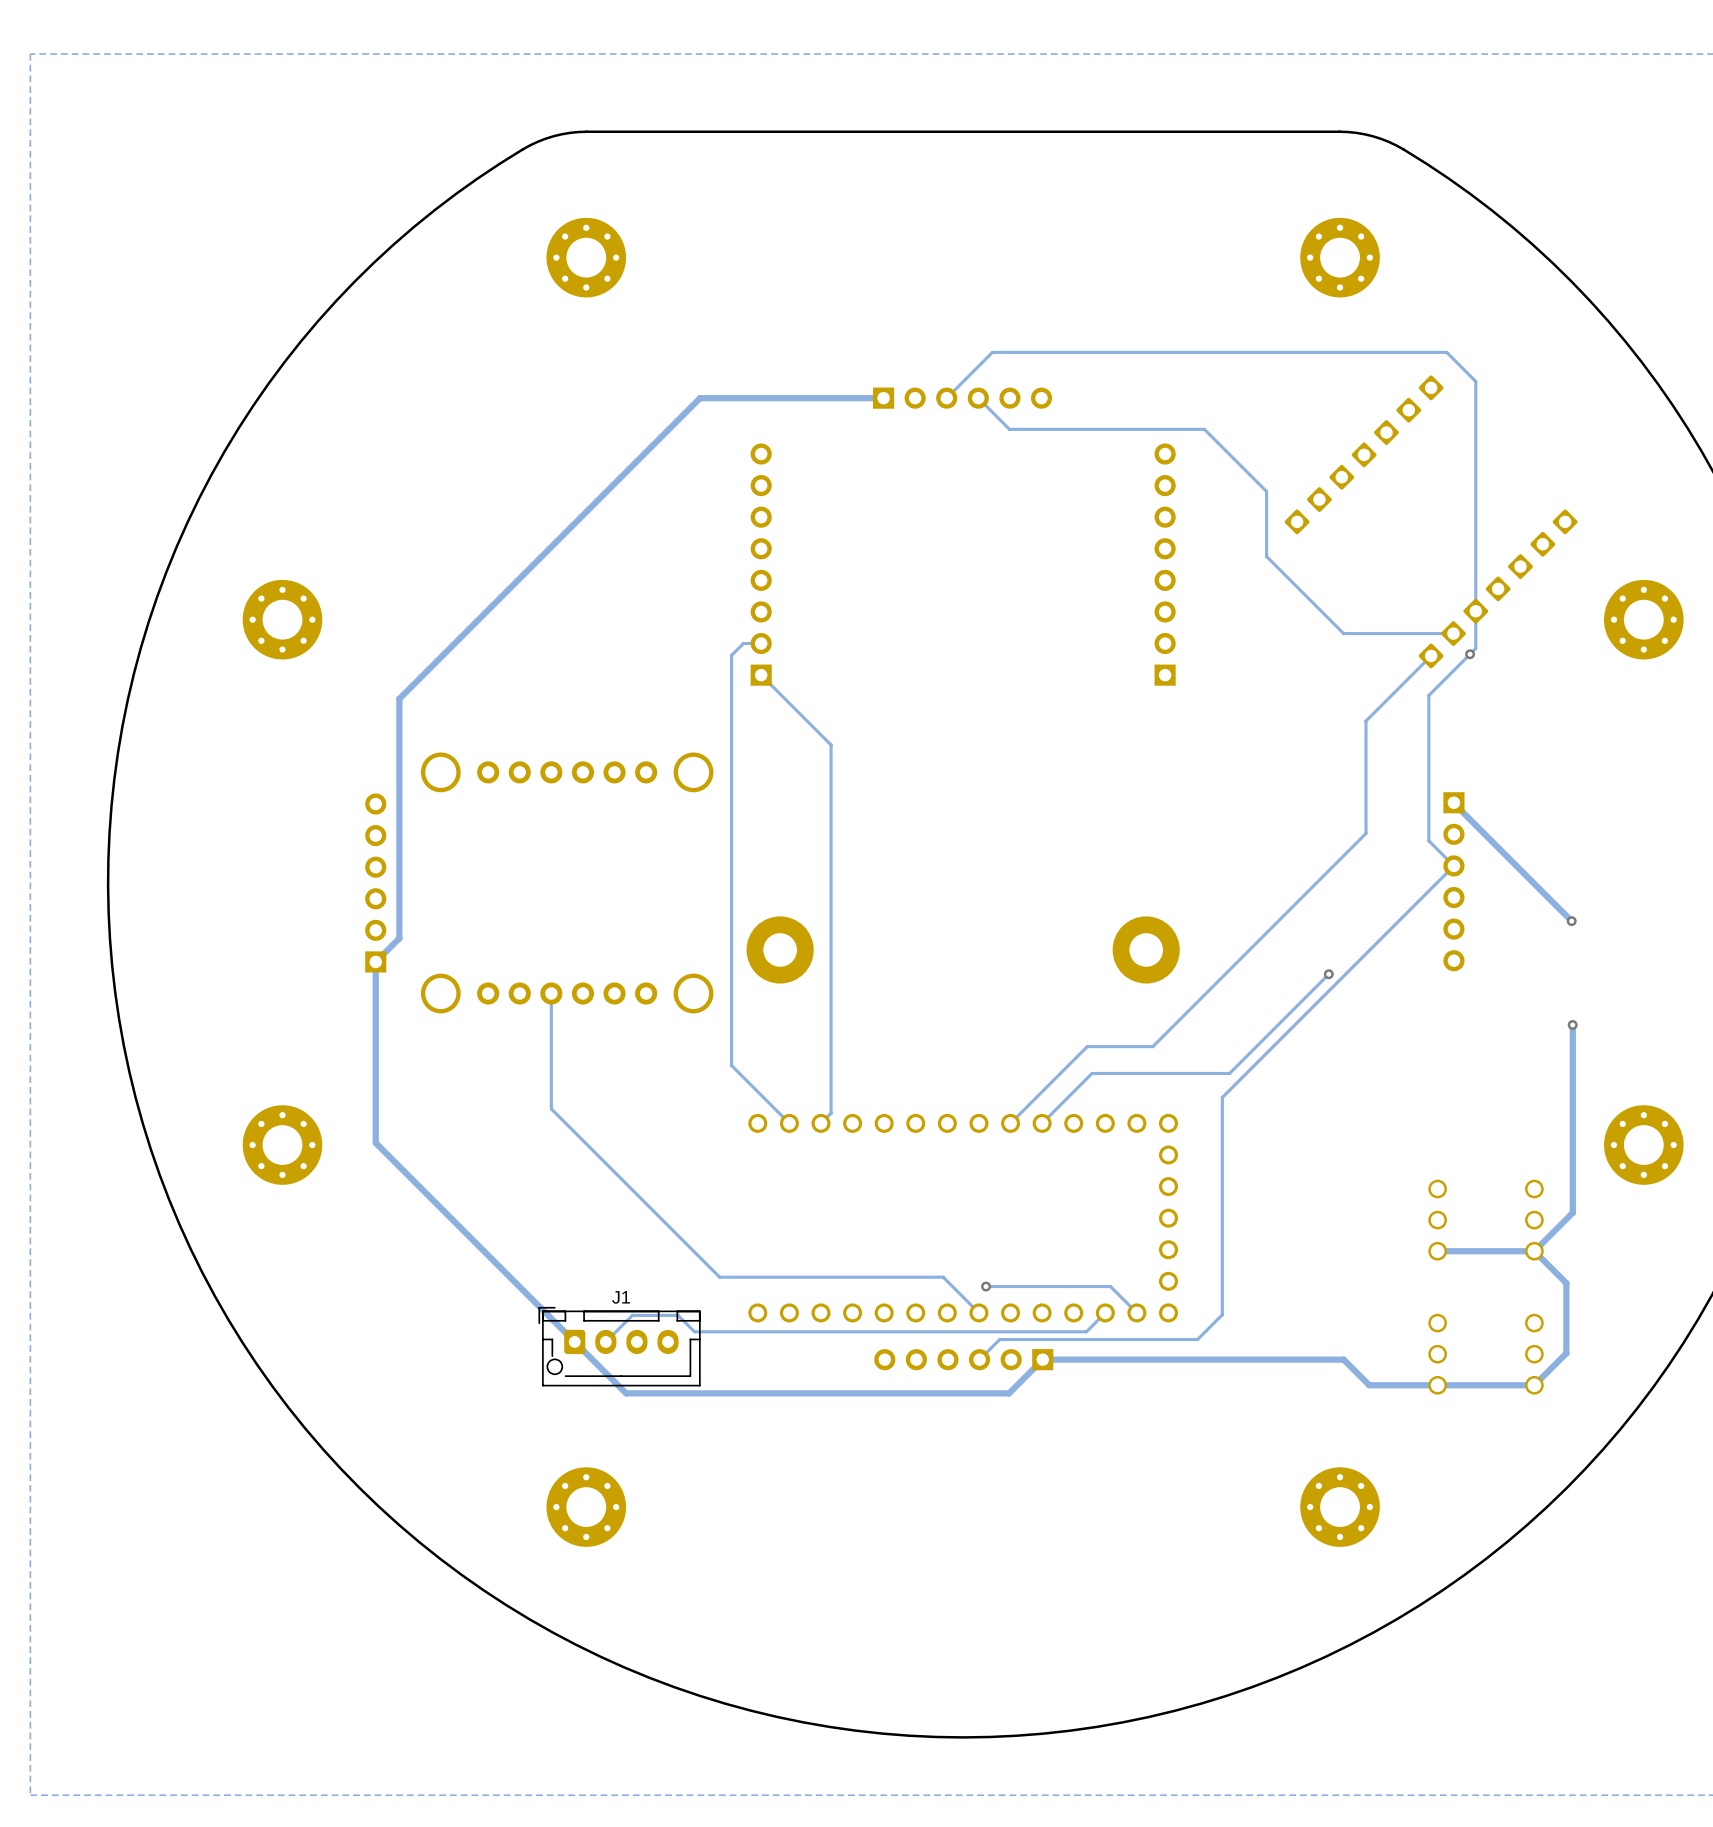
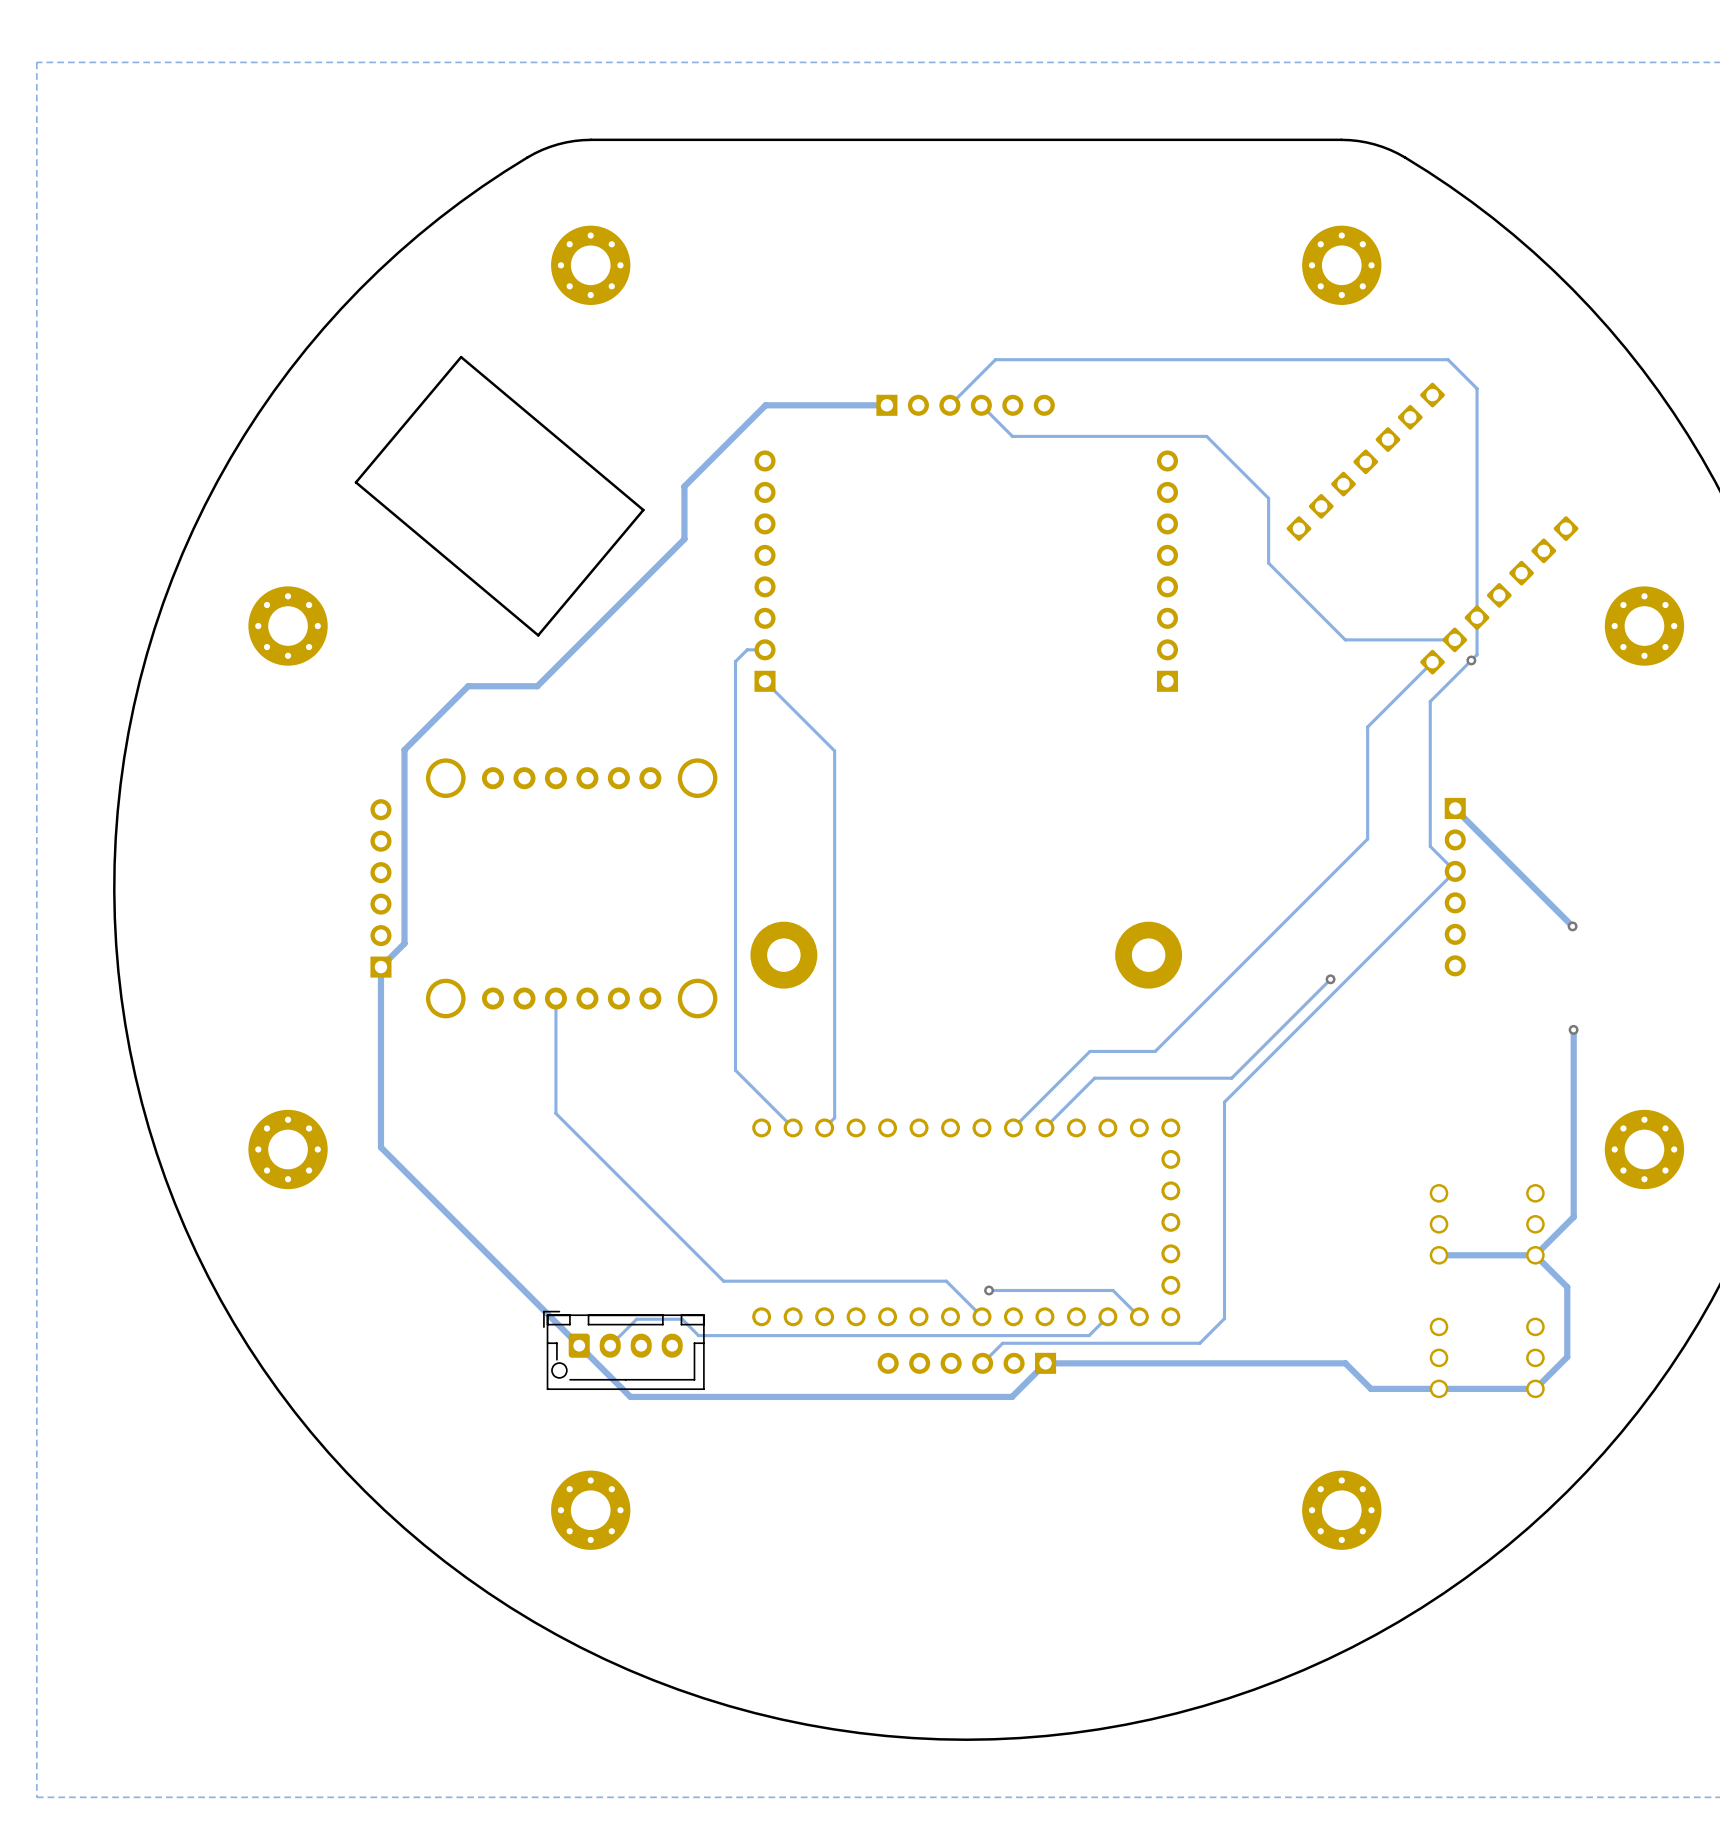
board edge: none -> (461, 357) (643, 510) (538, 635) (355, 482) (461, 357)
track: (761, 398) (700, 398) (399, 698) (399, 744) -> (765, 405) (684, 486) (684, 539) (537, 686) (468, 686) (404, 749)
J1 name: J1 (621, 1297) -> none

